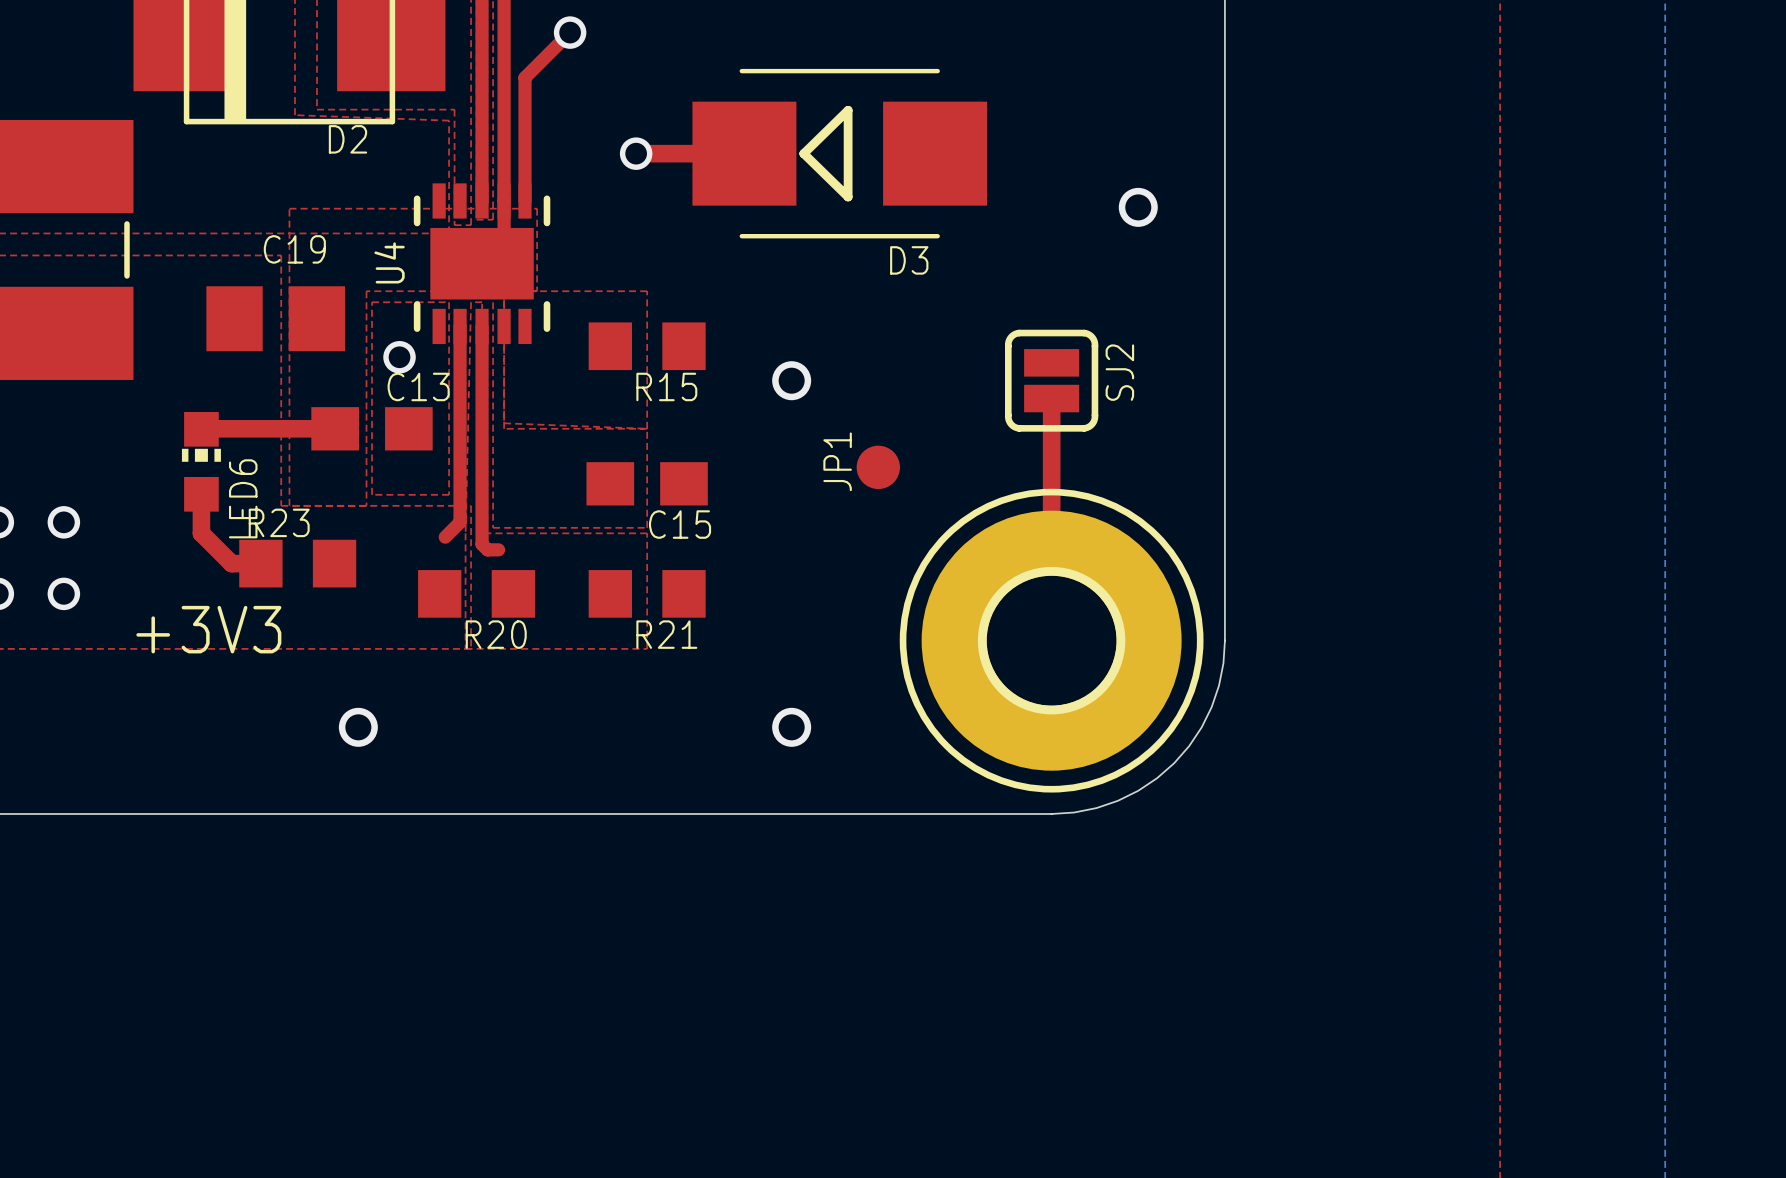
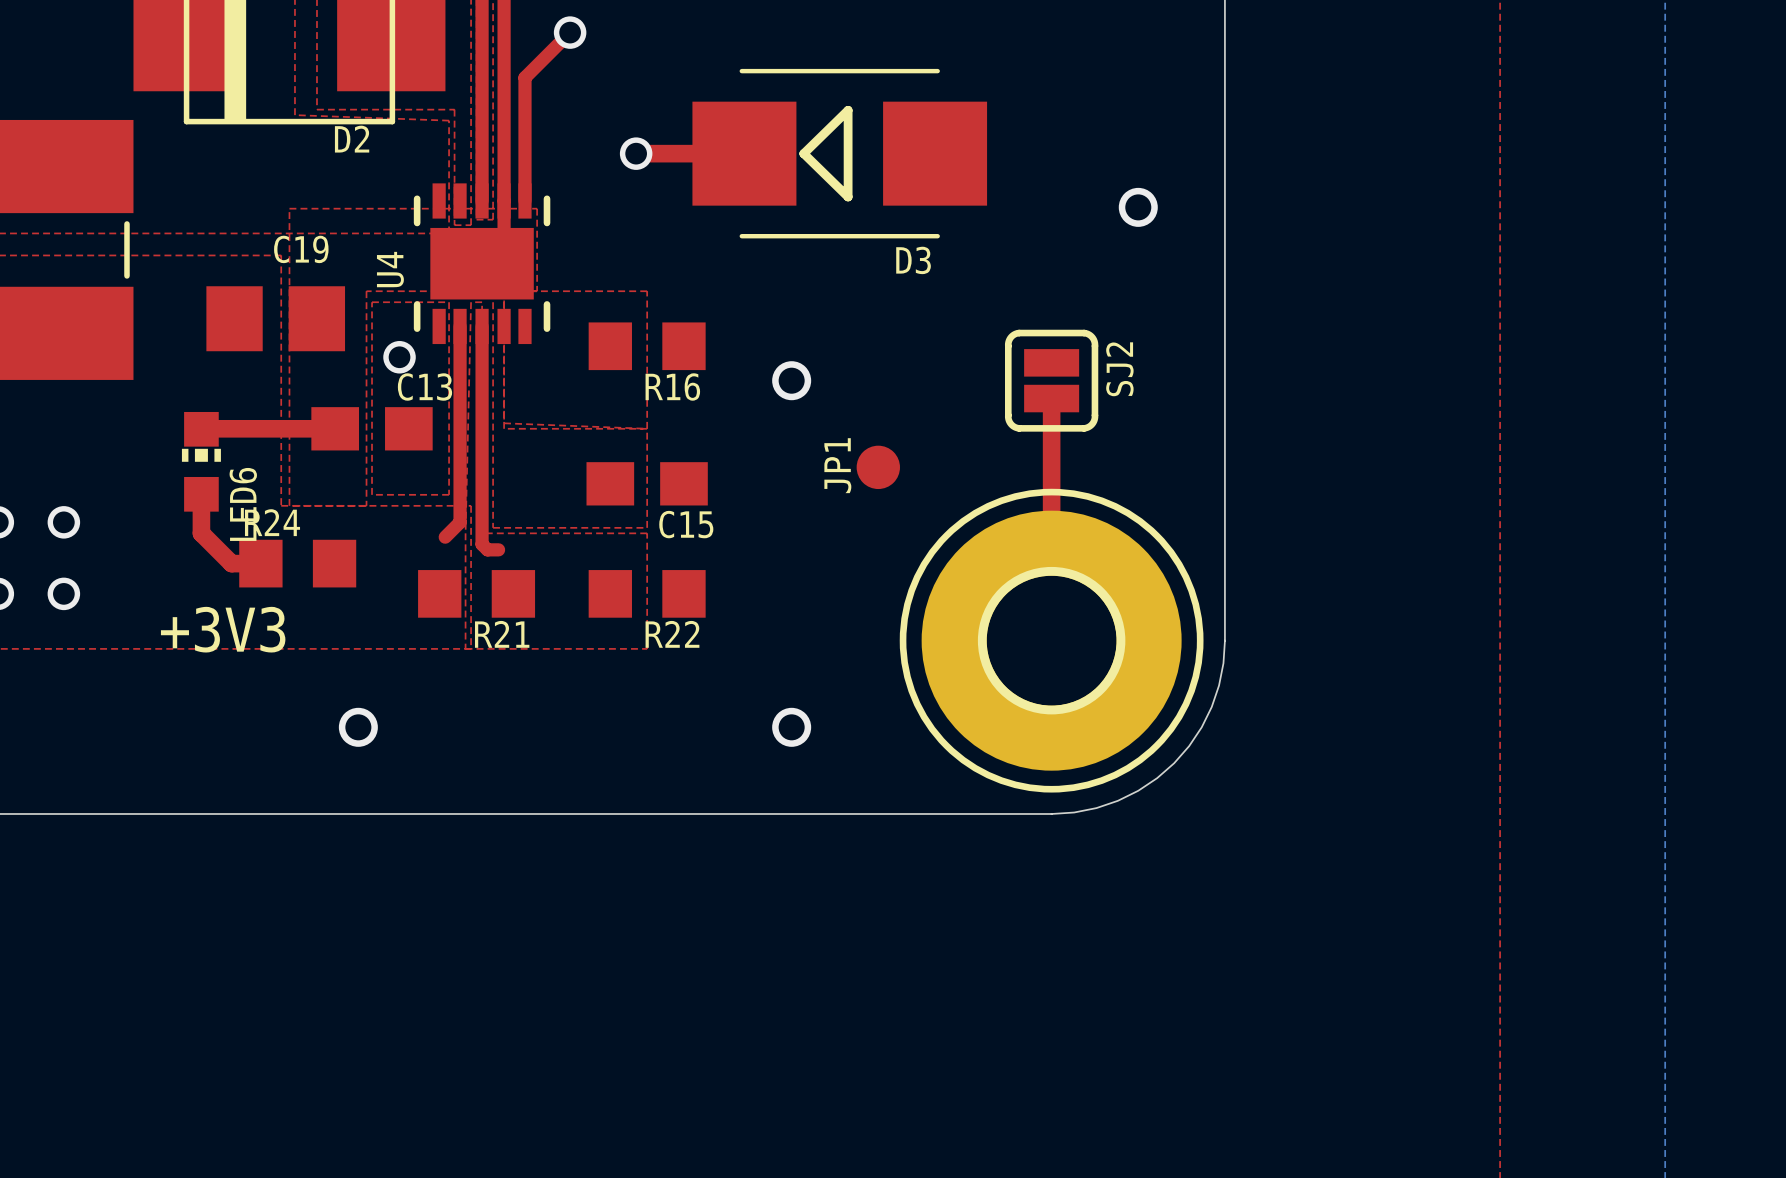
R15 name: R15 (666, 386) -> R16 (672, 386)
R23 name: R23 (279, 522) -> R24 (272, 522)
R20 name: R20 (496, 634) -> R21 (502, 634)
R21 name: R21 (666, 634) -> R22 (672, 634)

